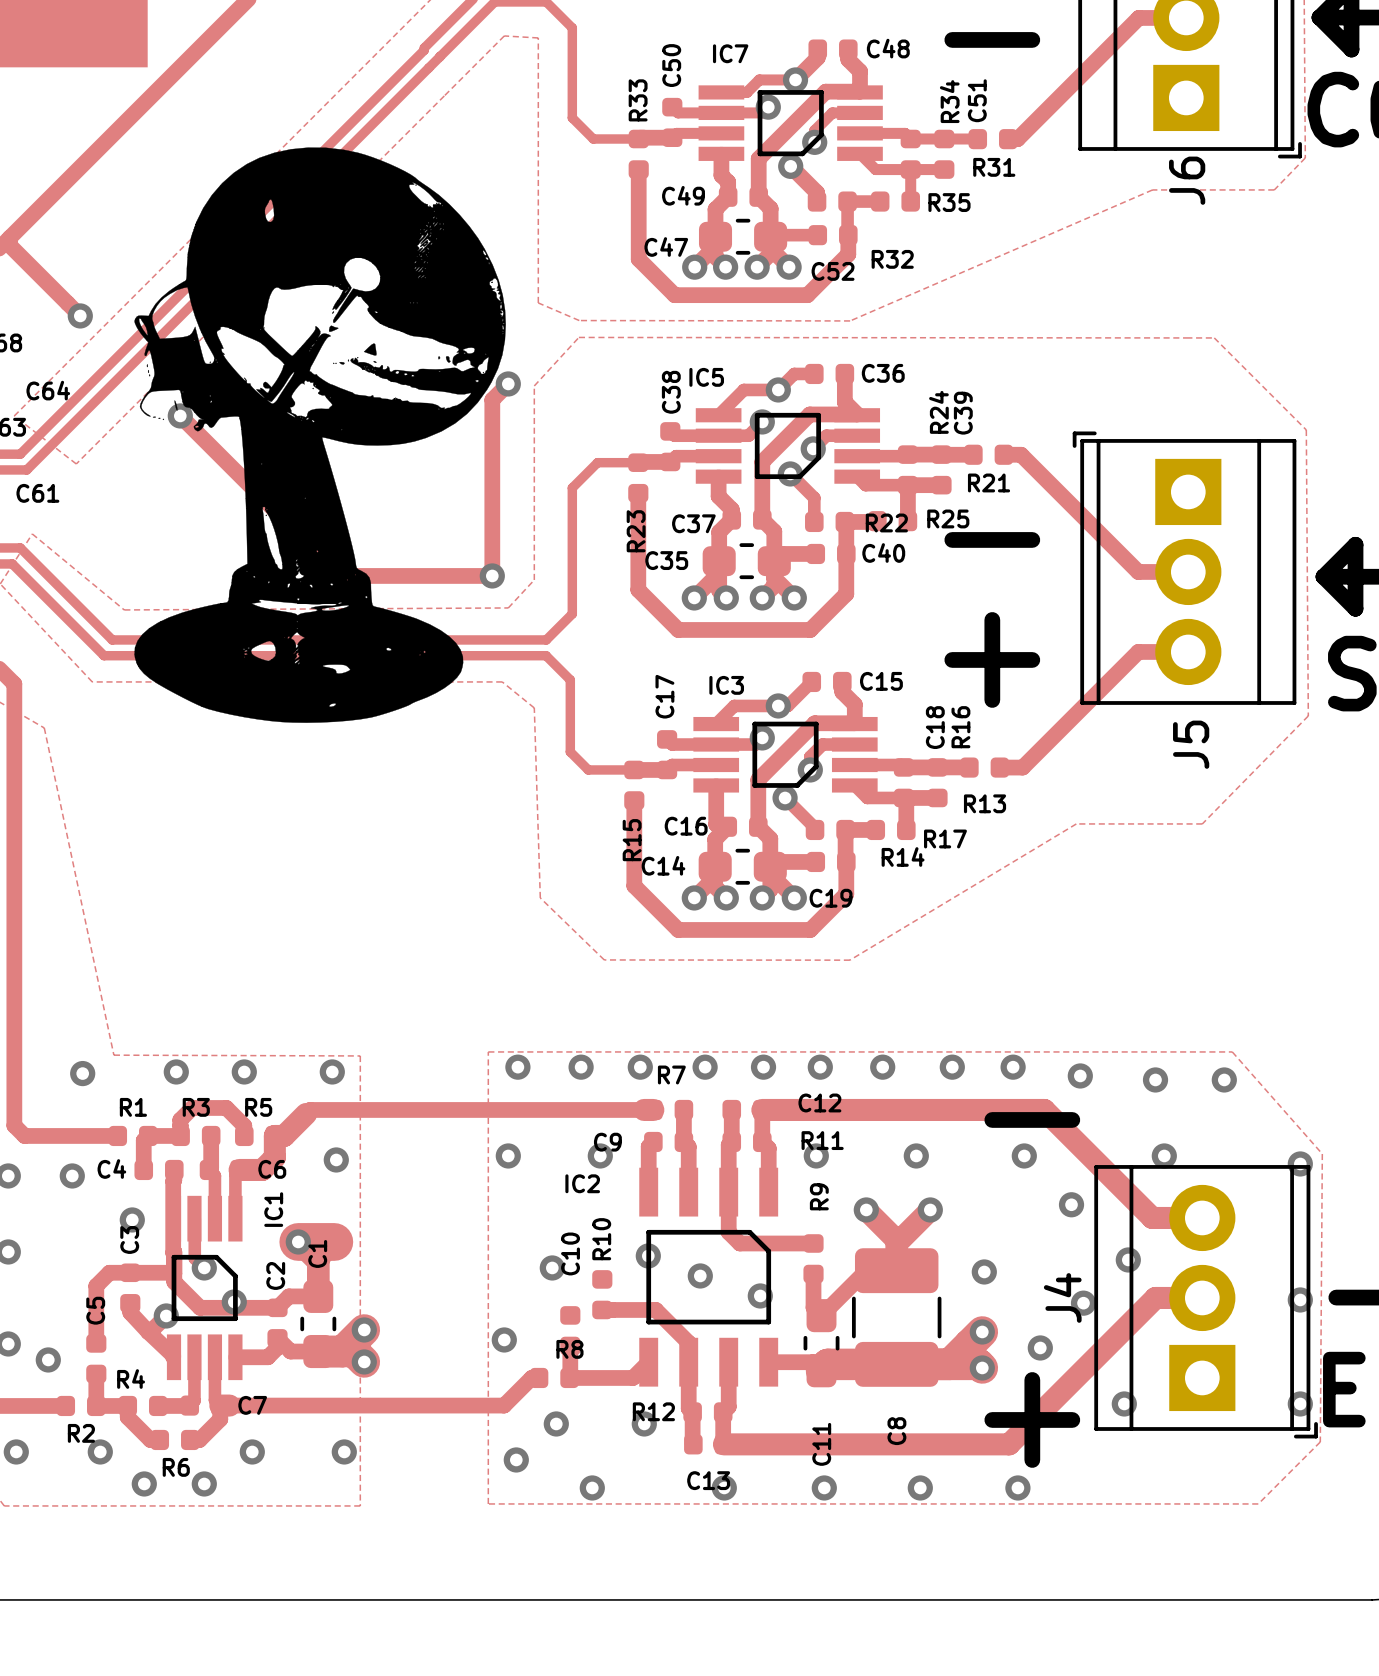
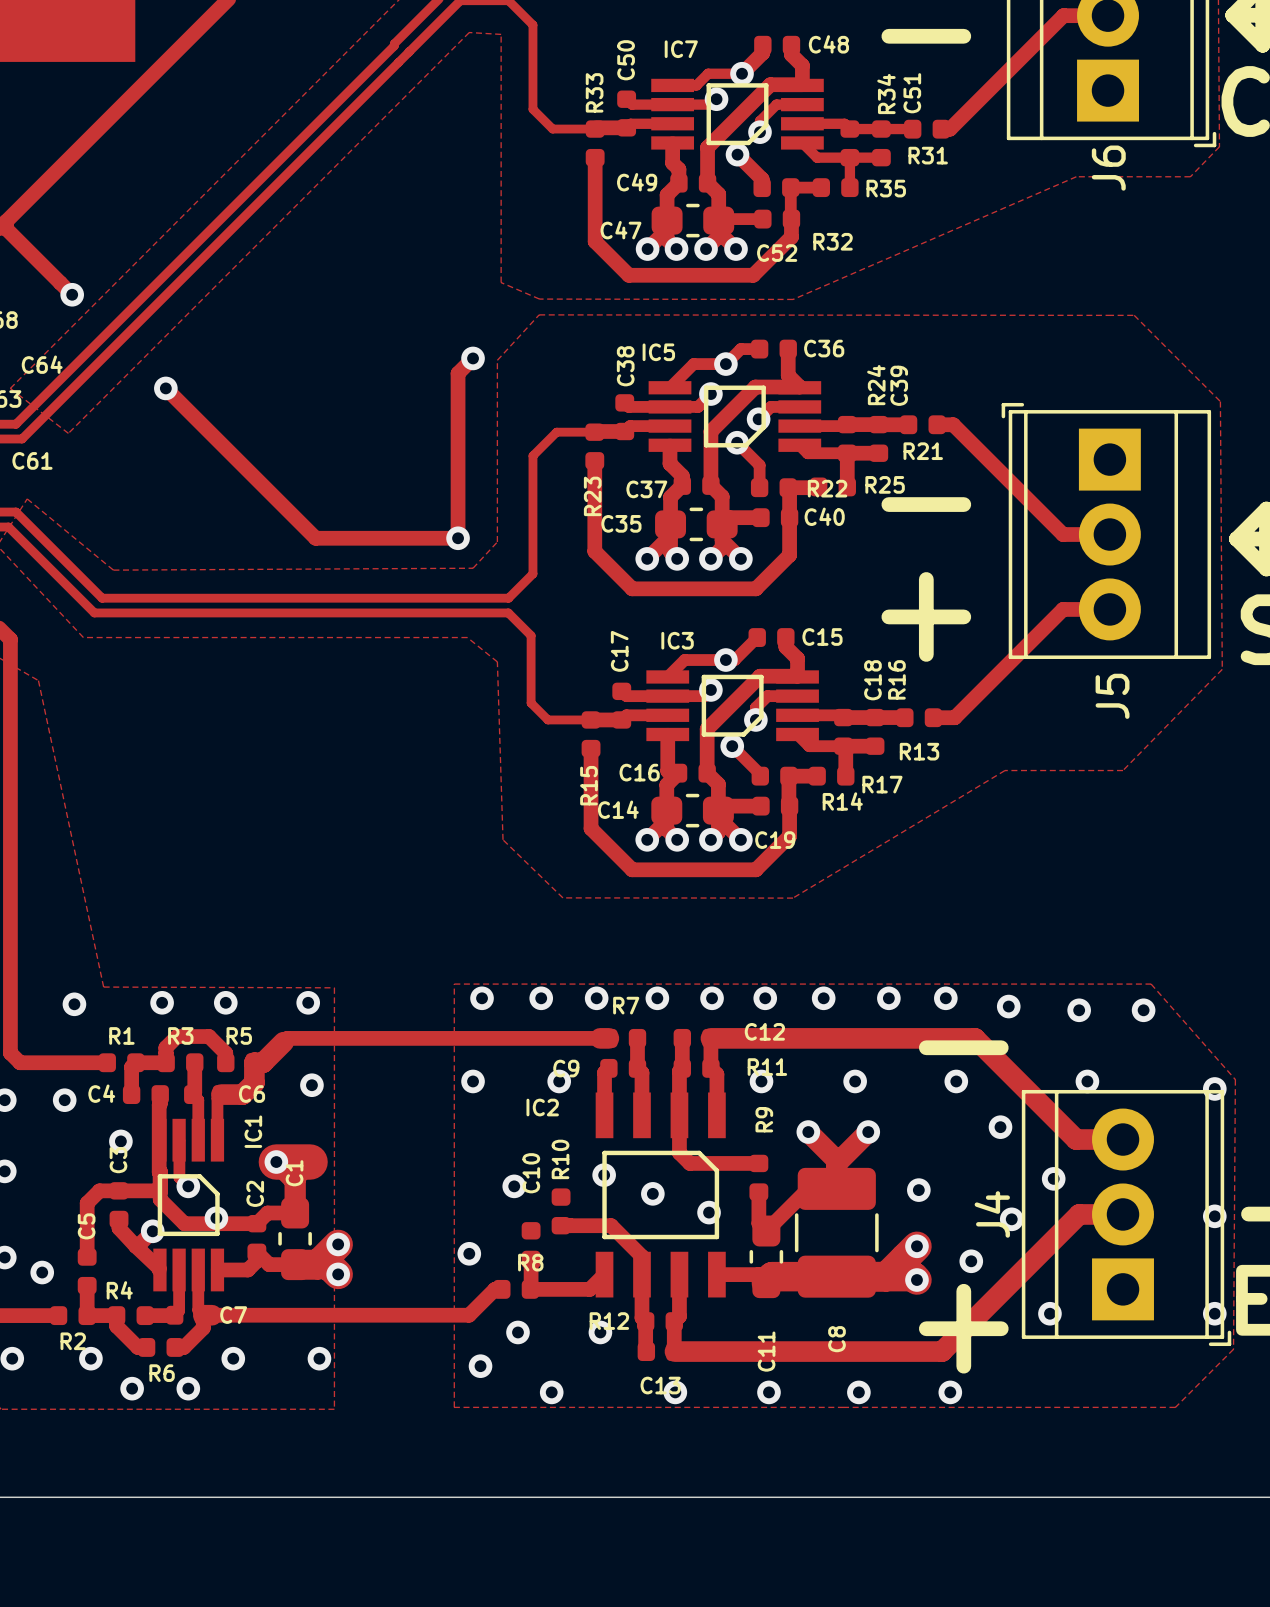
drawing: [134, 147, 506, 723] -> none

